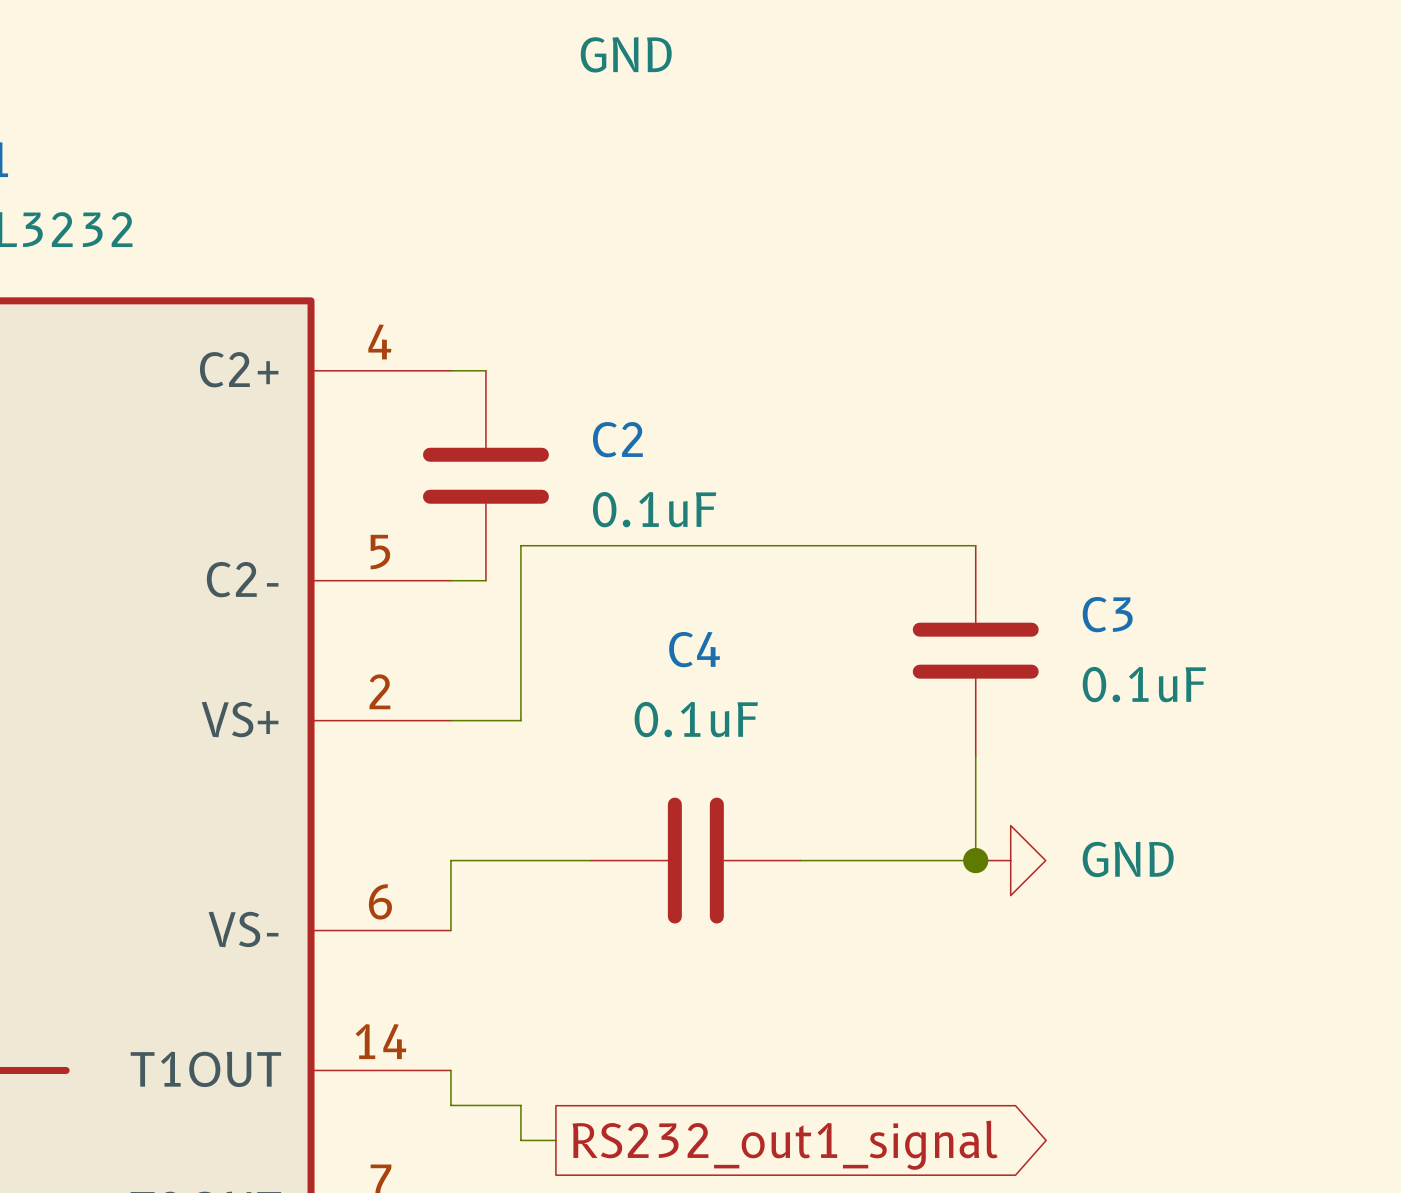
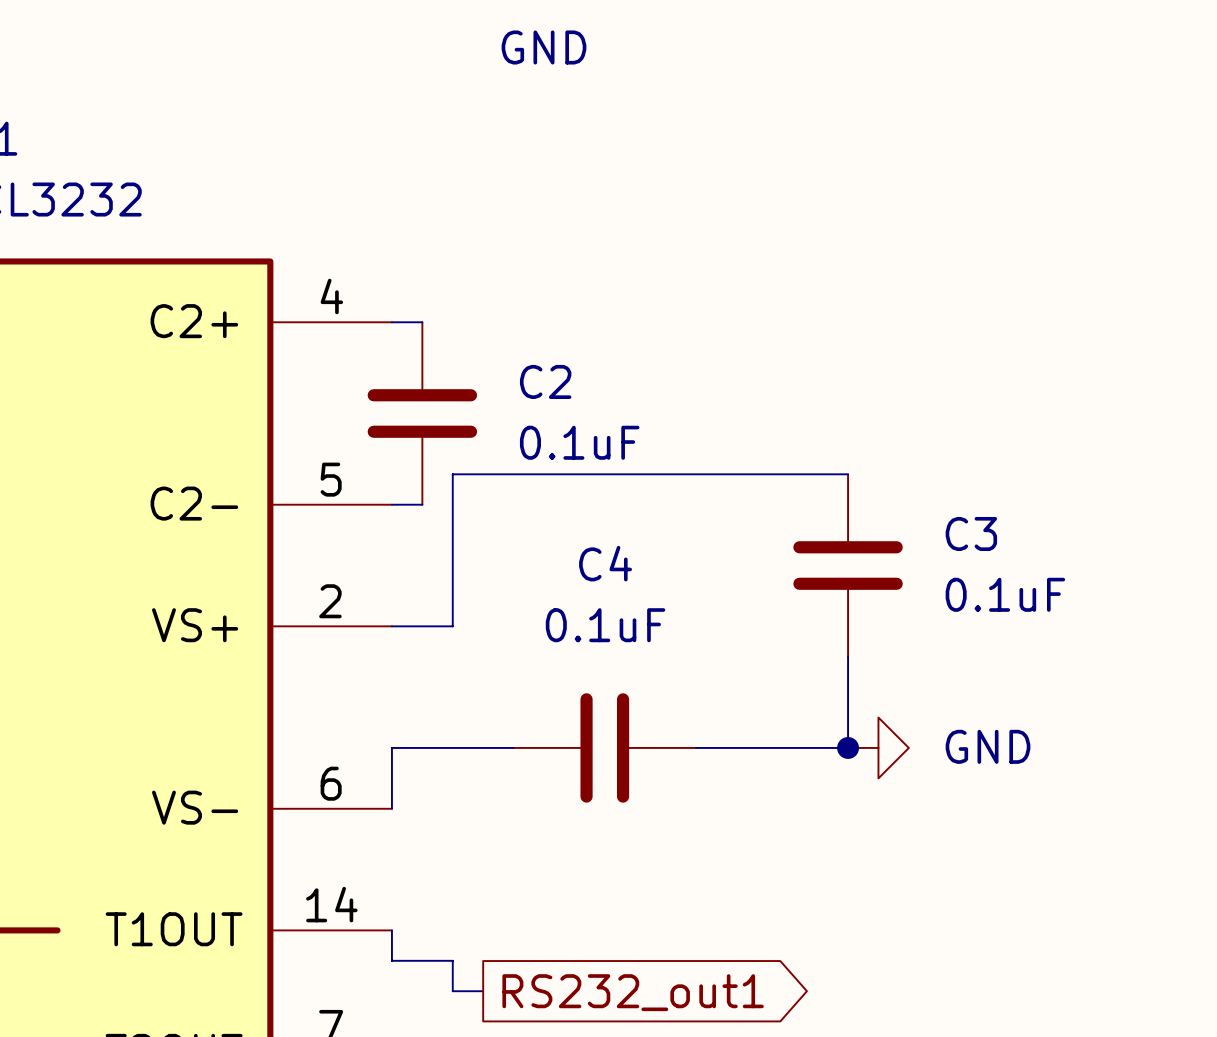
global label: RS232_out1_signal (785, 1145) -> RS232_out1 (633, 992)

